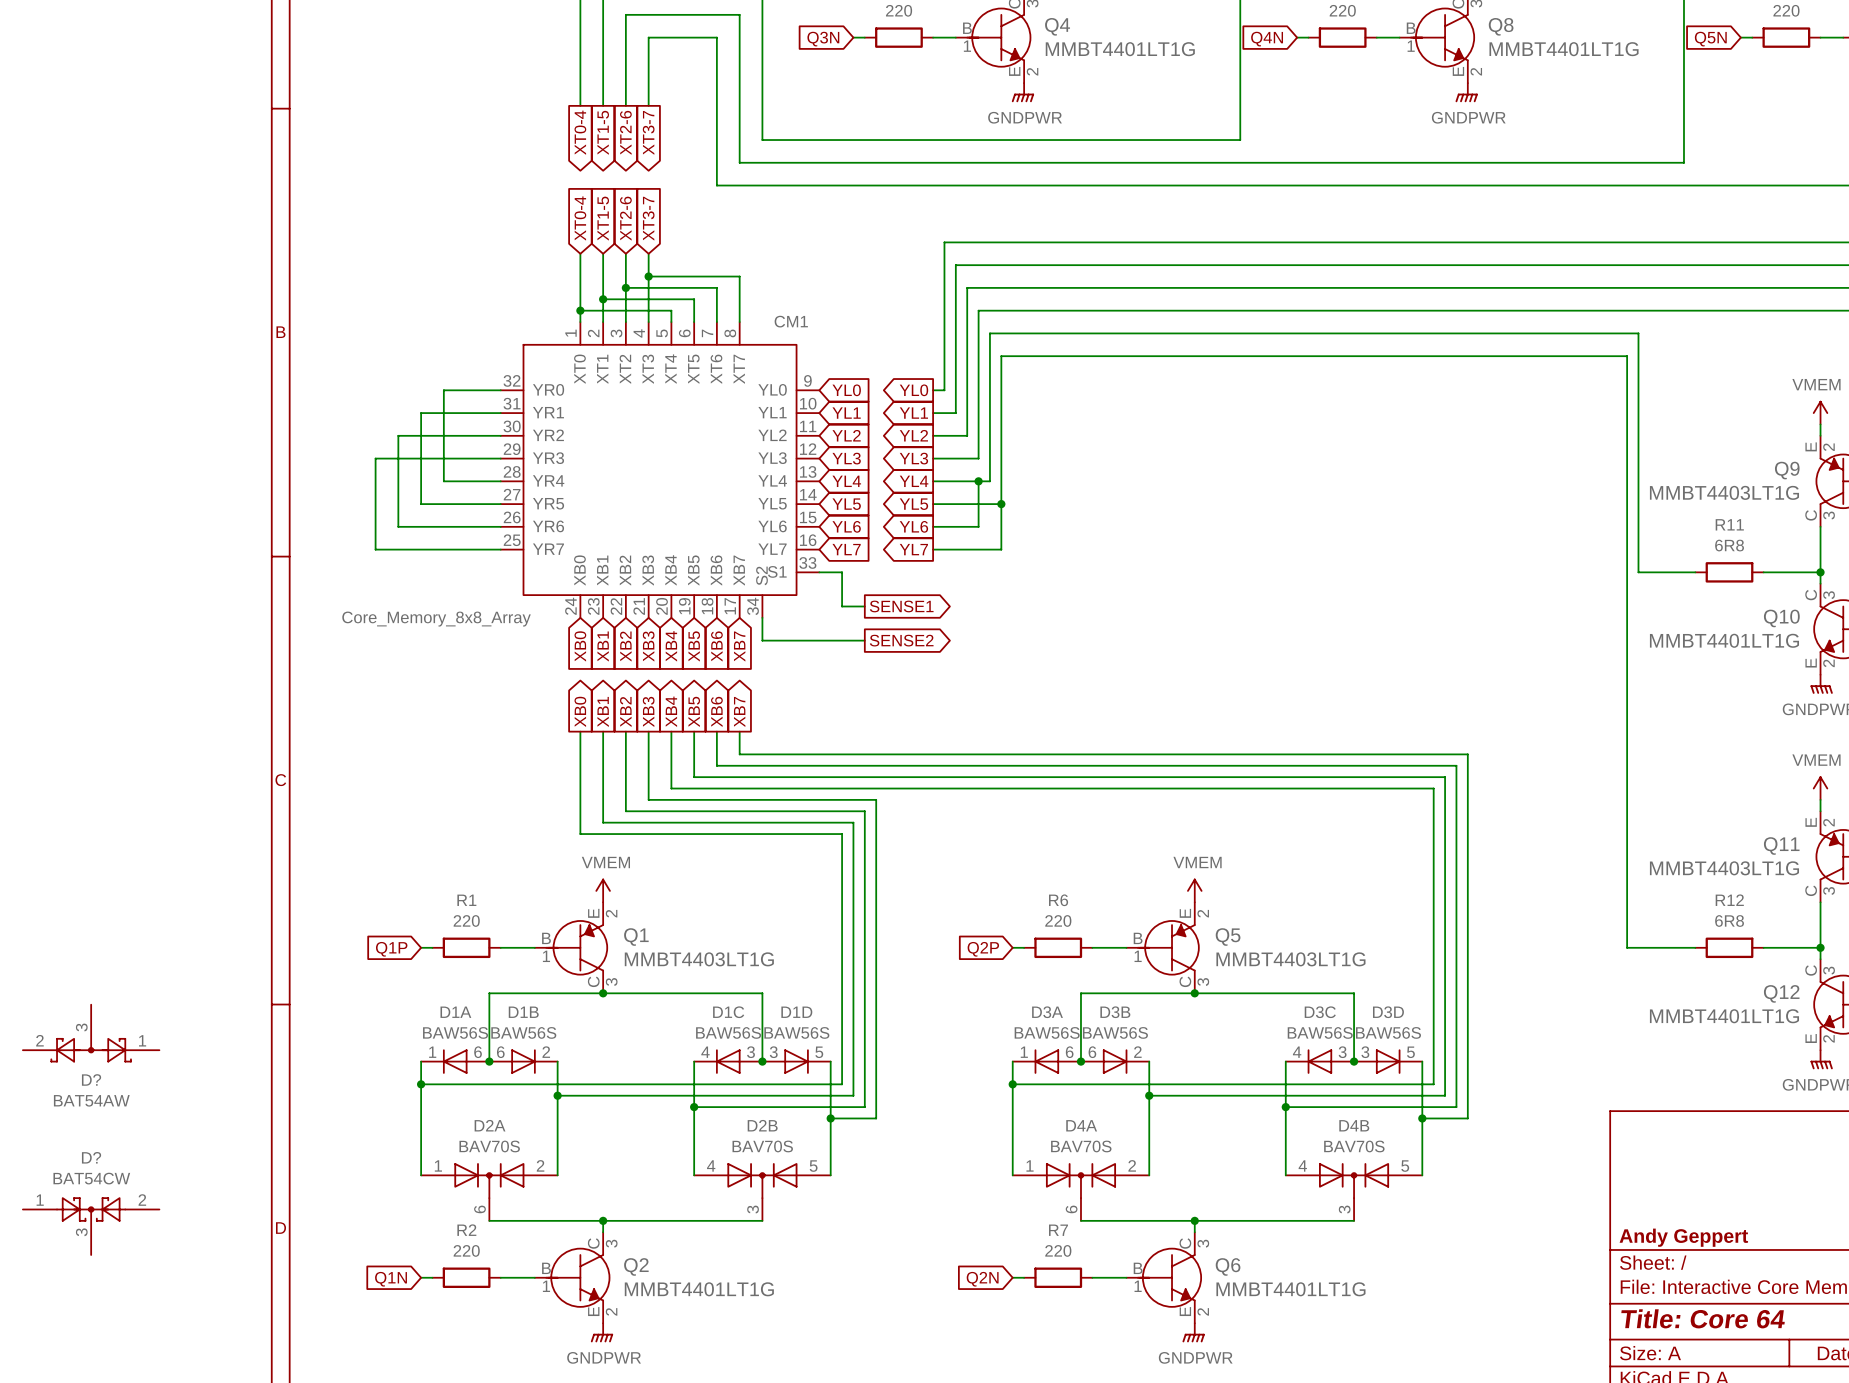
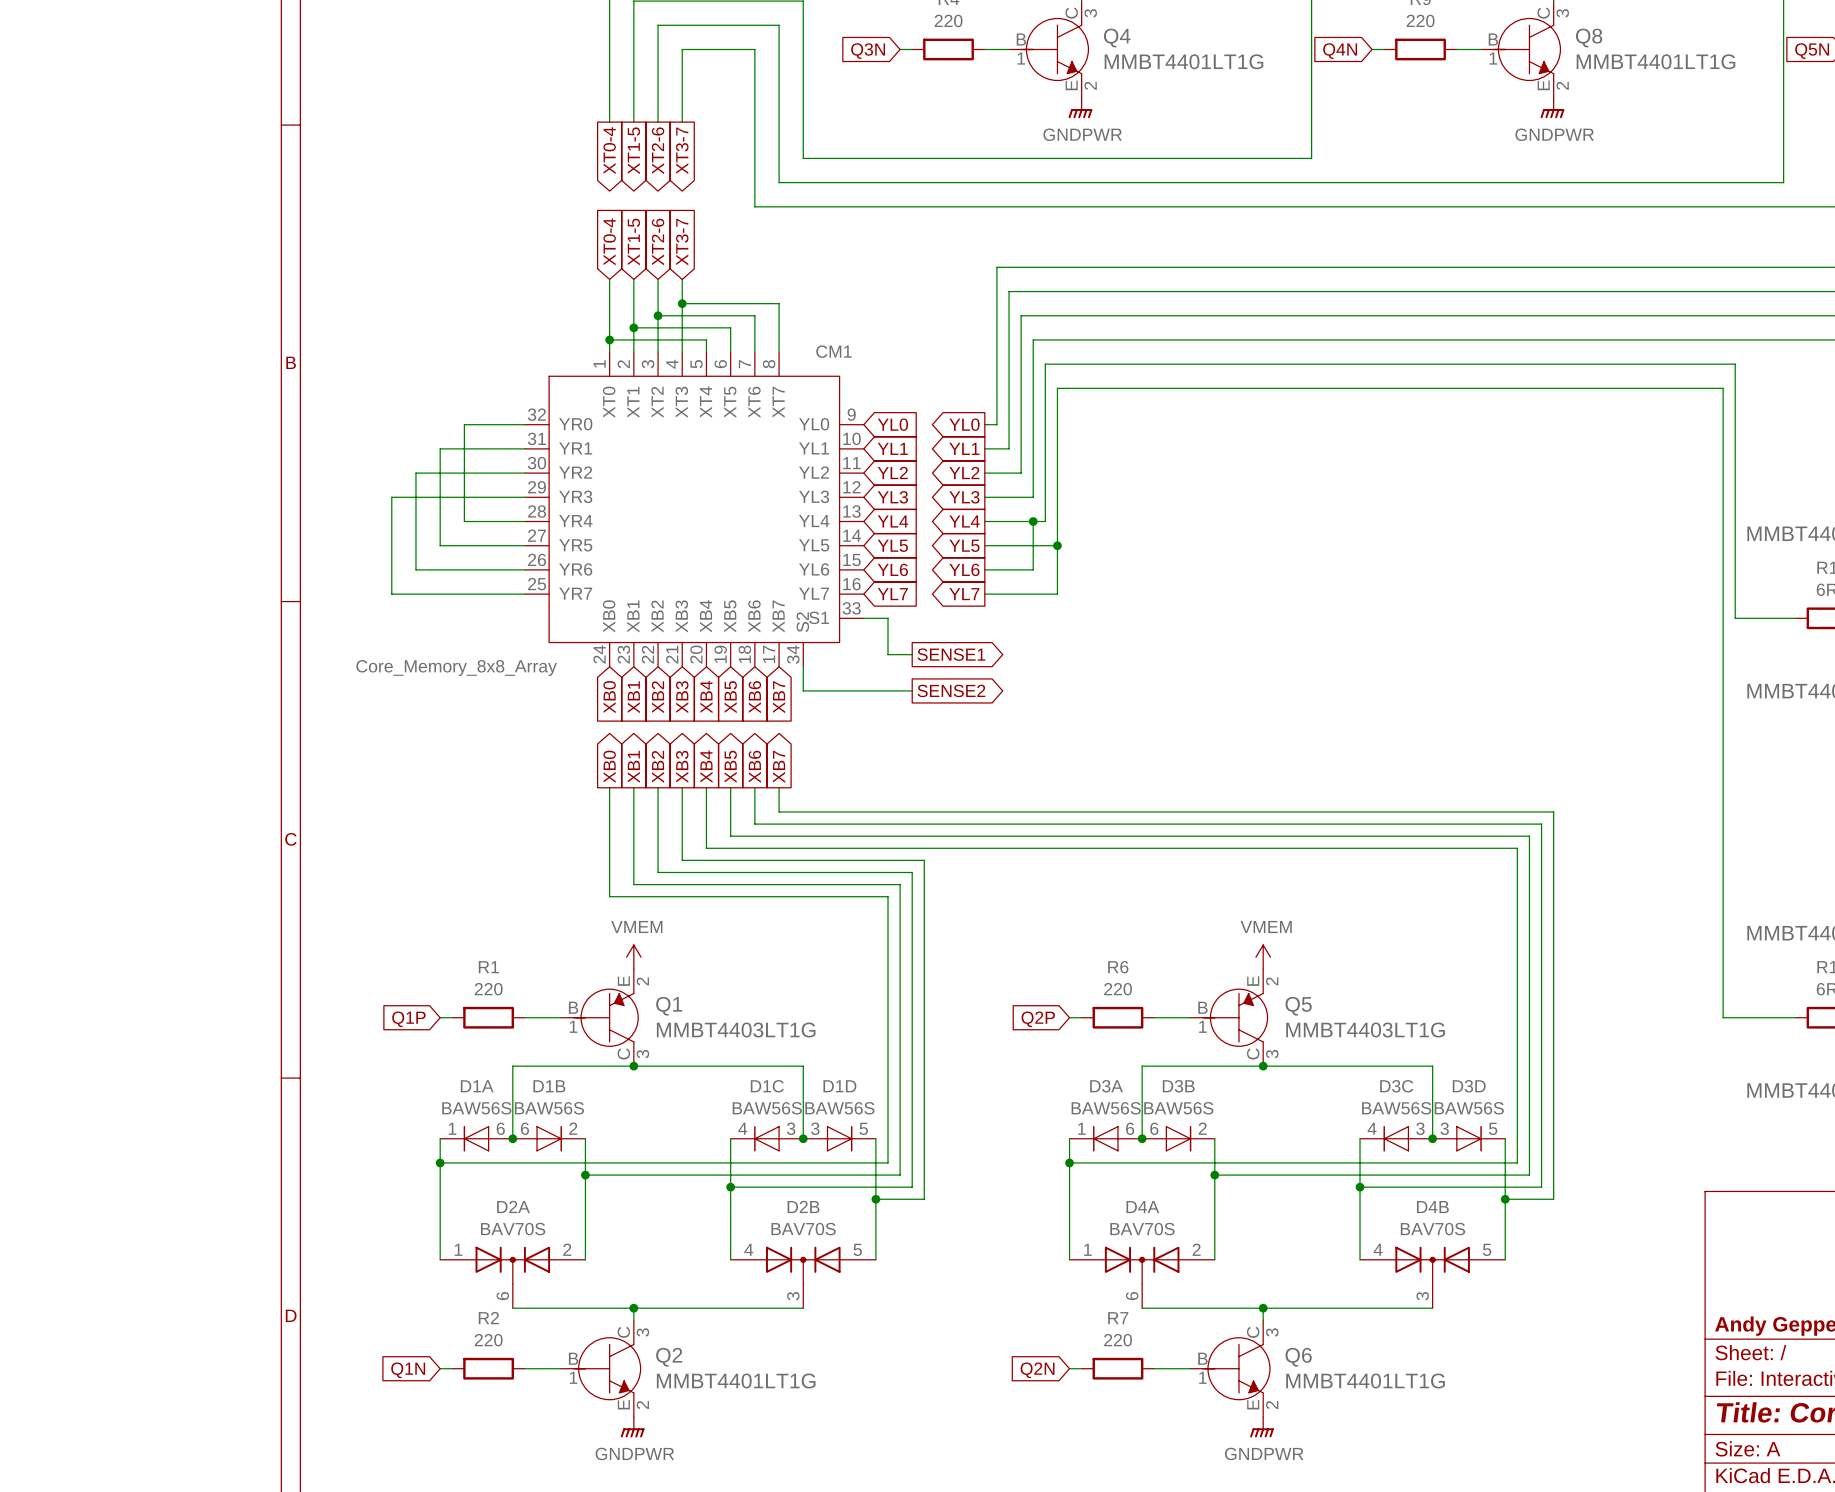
D?: BAT54AW (91, 1033) -> none
D?: BAT54CW (91, 1226) -> none

